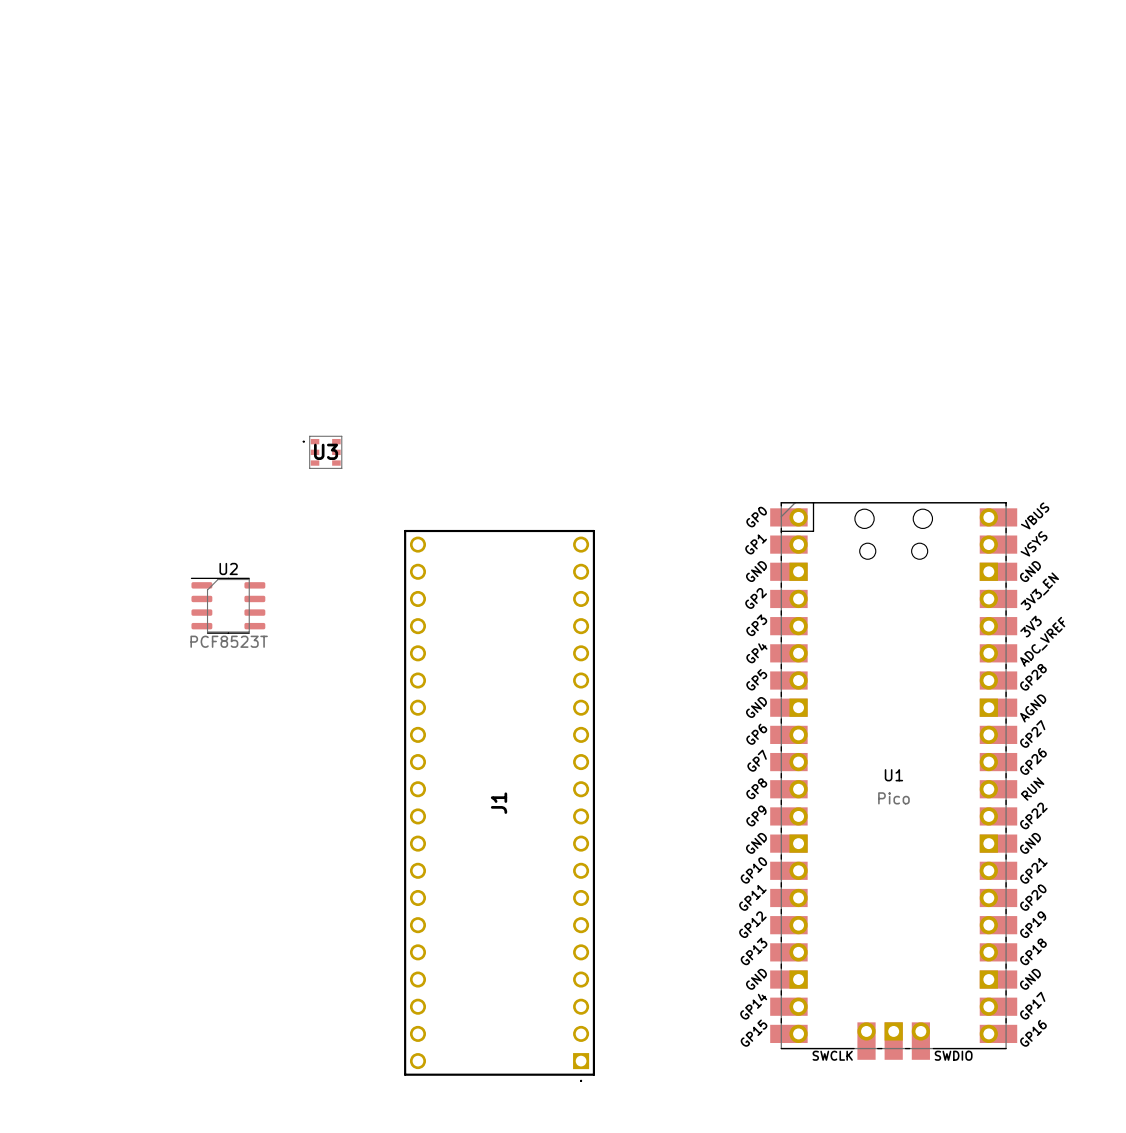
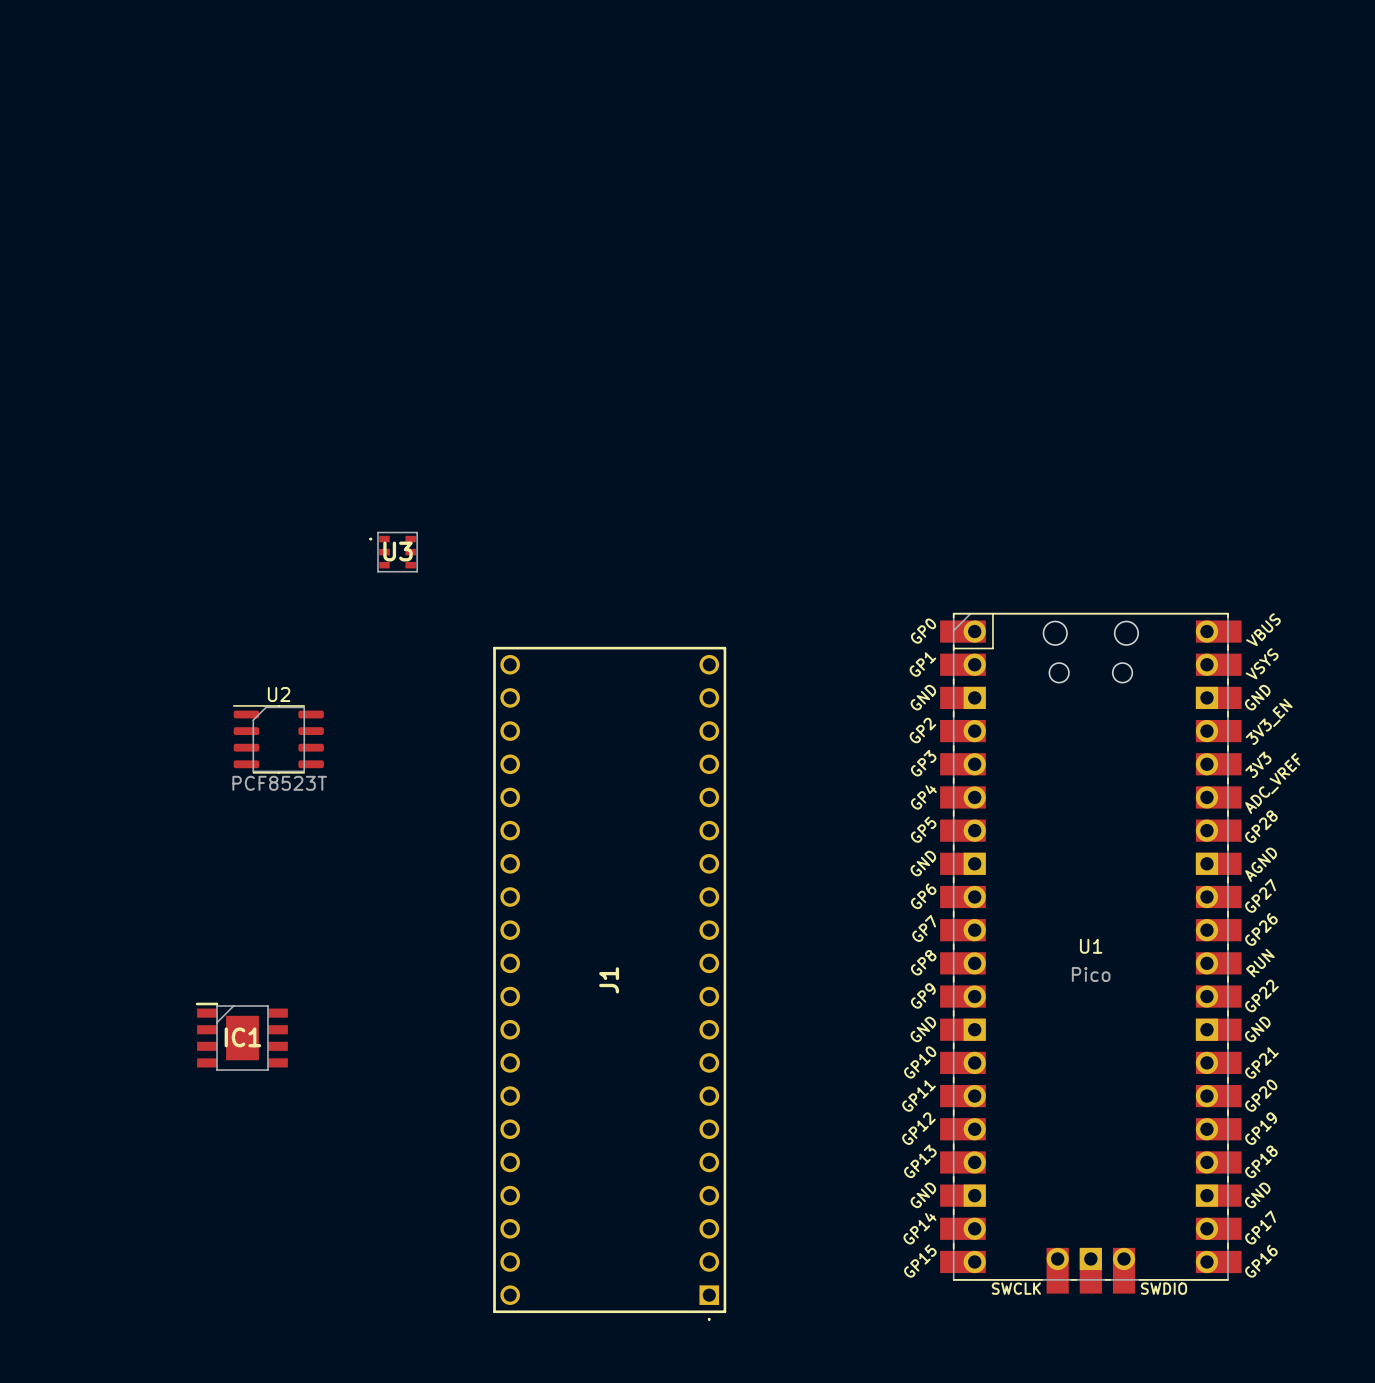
IC1: none -> (241, 1036)

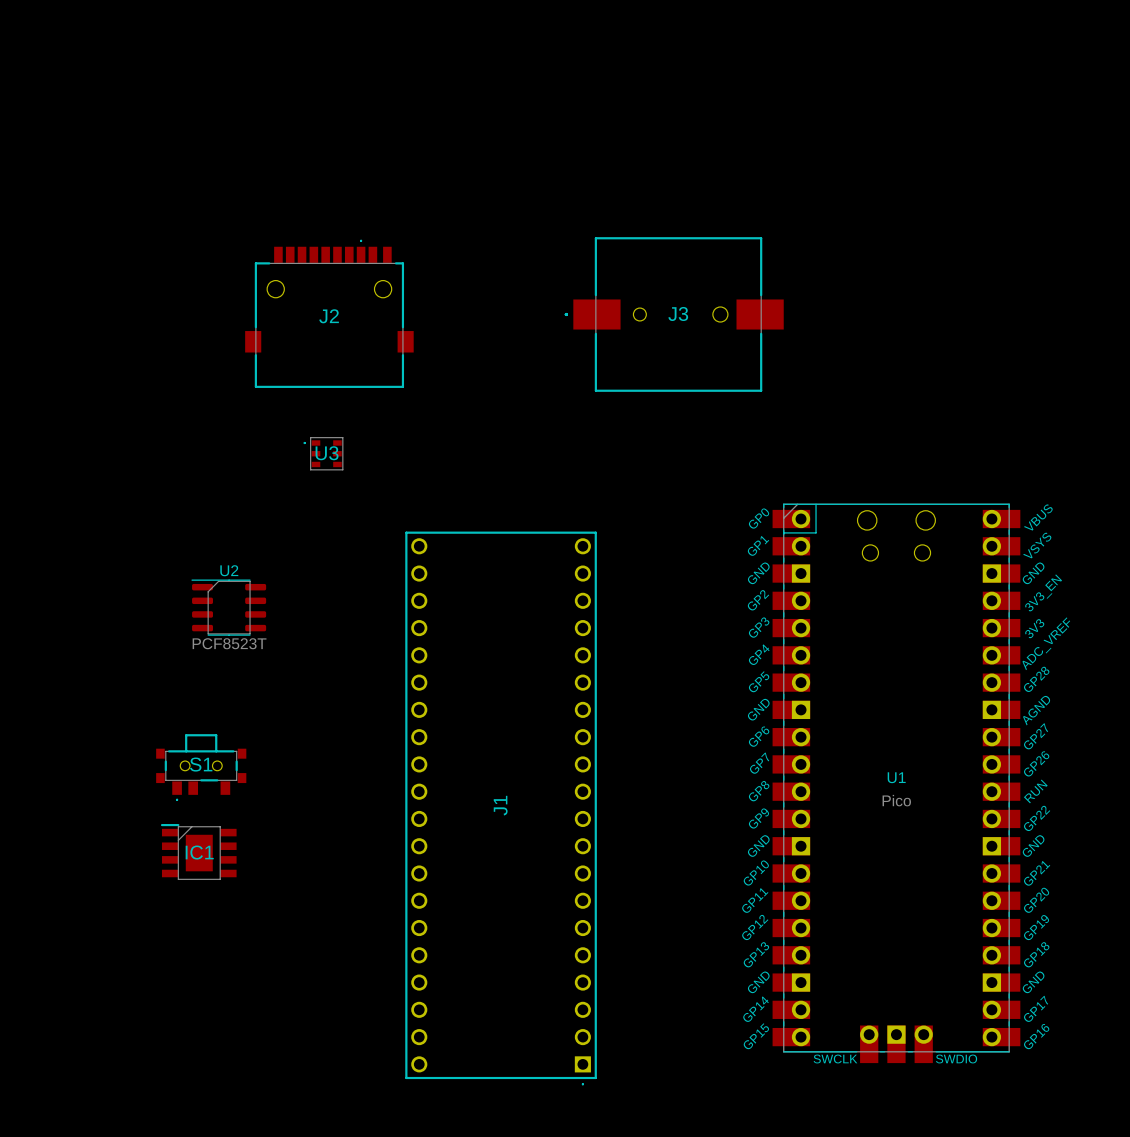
J2: none -> (329, 313)
J3: none -> (674, 314)
S1: none -> (201, 767)

